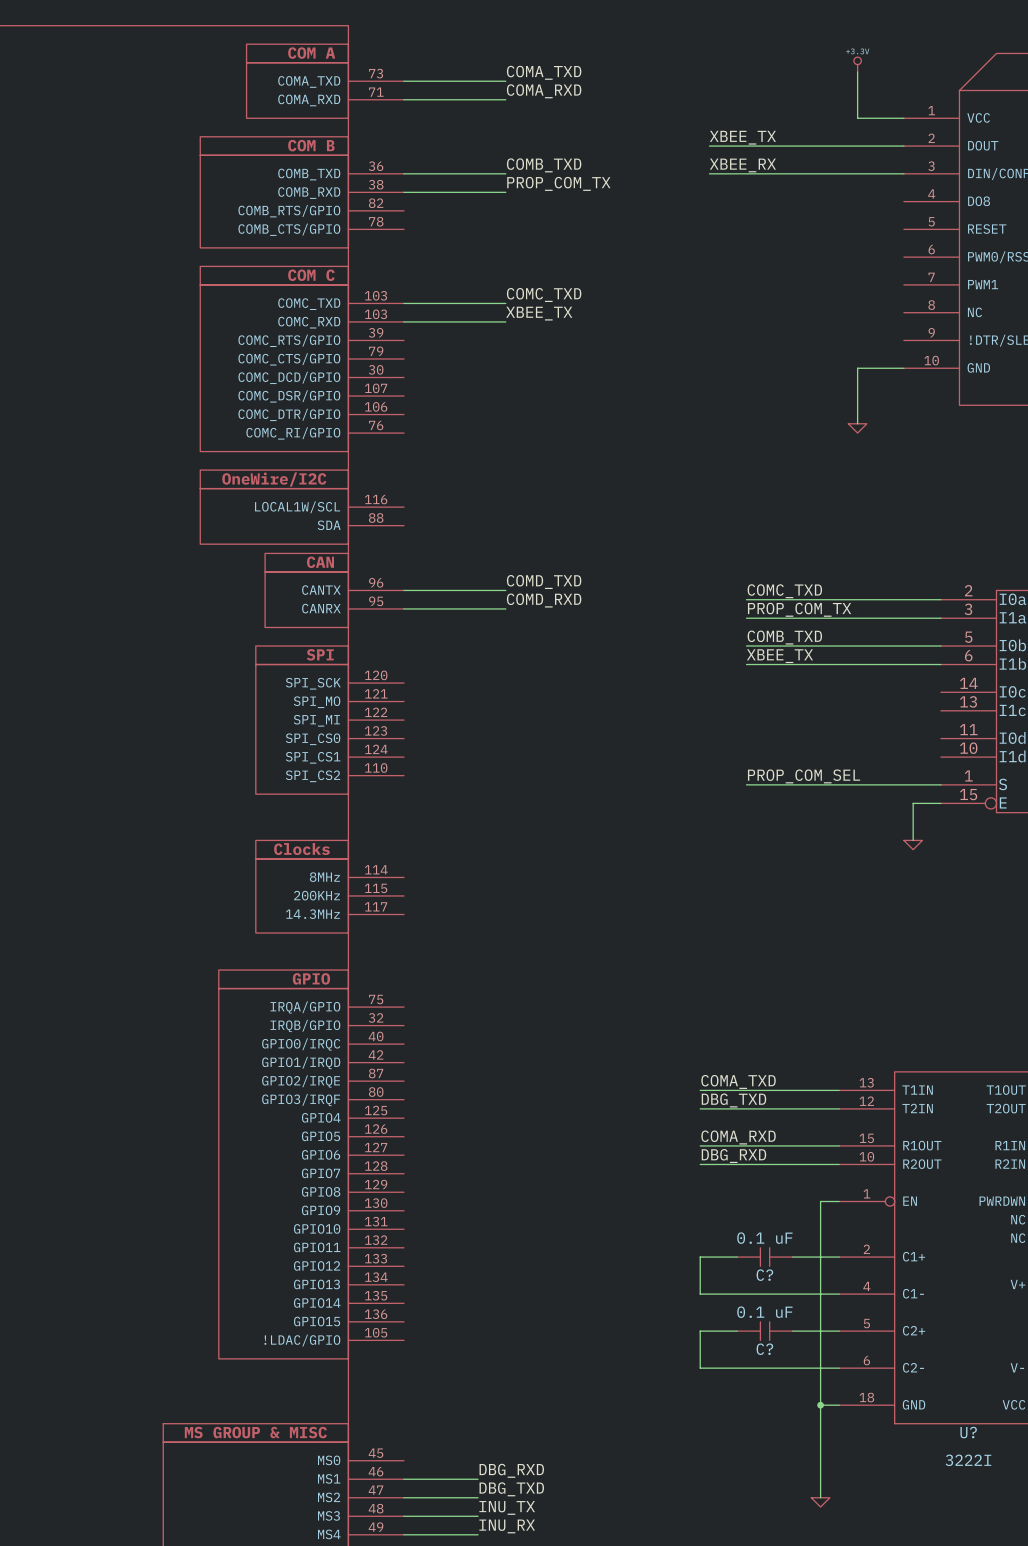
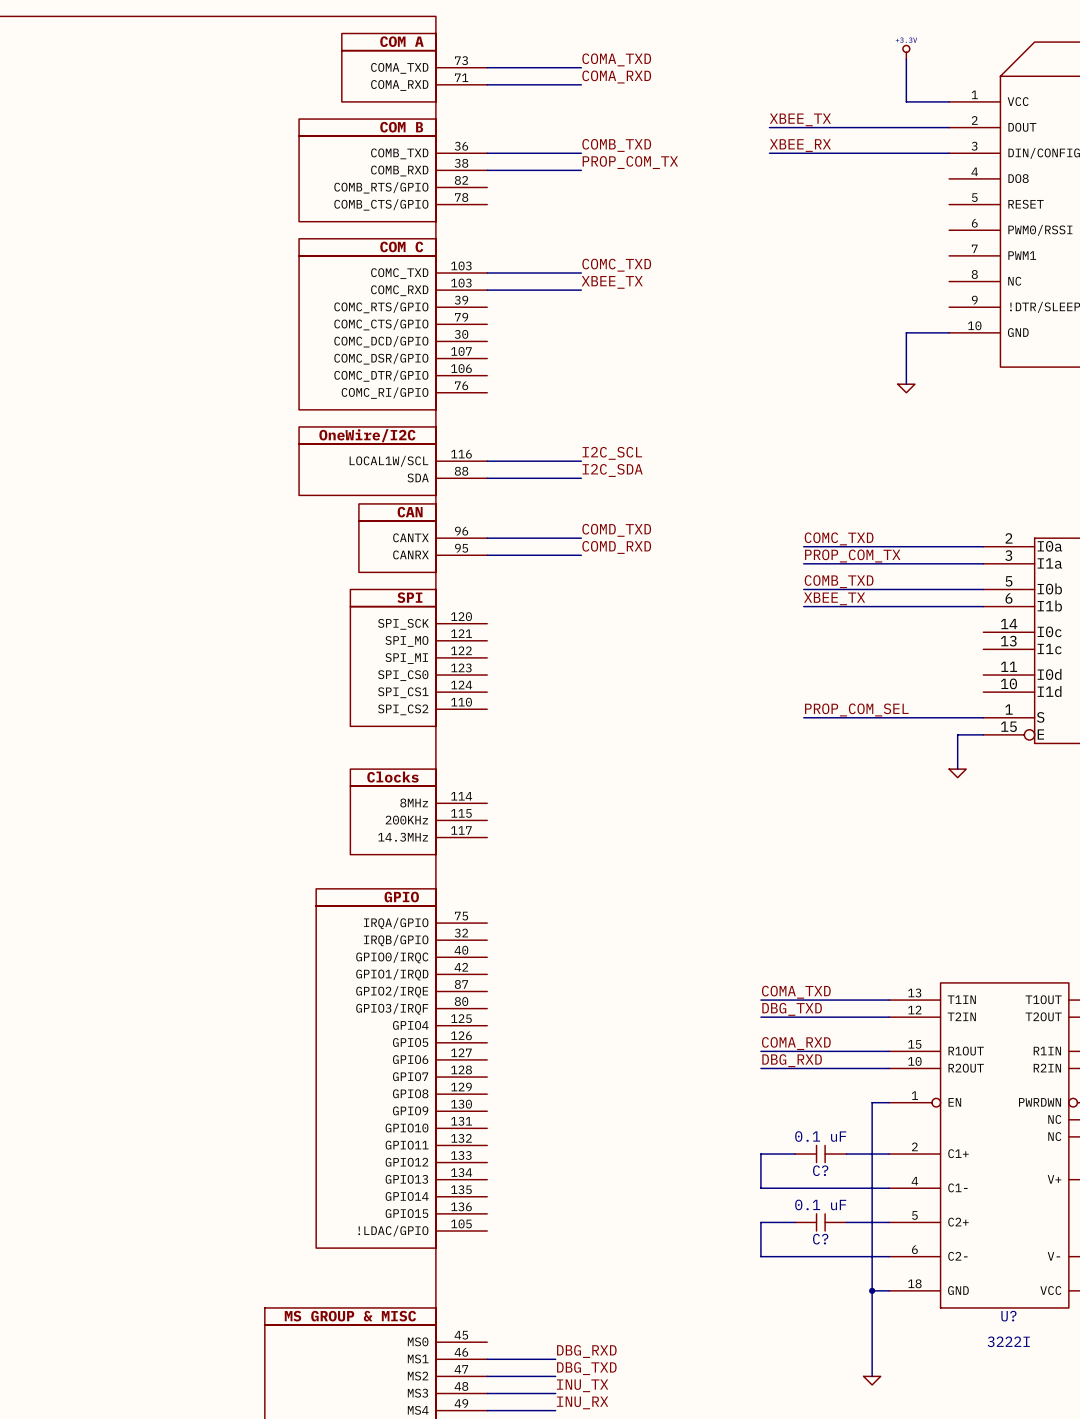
label: none -> I2C_SCL (612, 453)
wire: none -> (487, 461) (581, 461)
label: none -> I2C_SDA (612, 470)
wire: none -> (487, 478) (581, 478)

